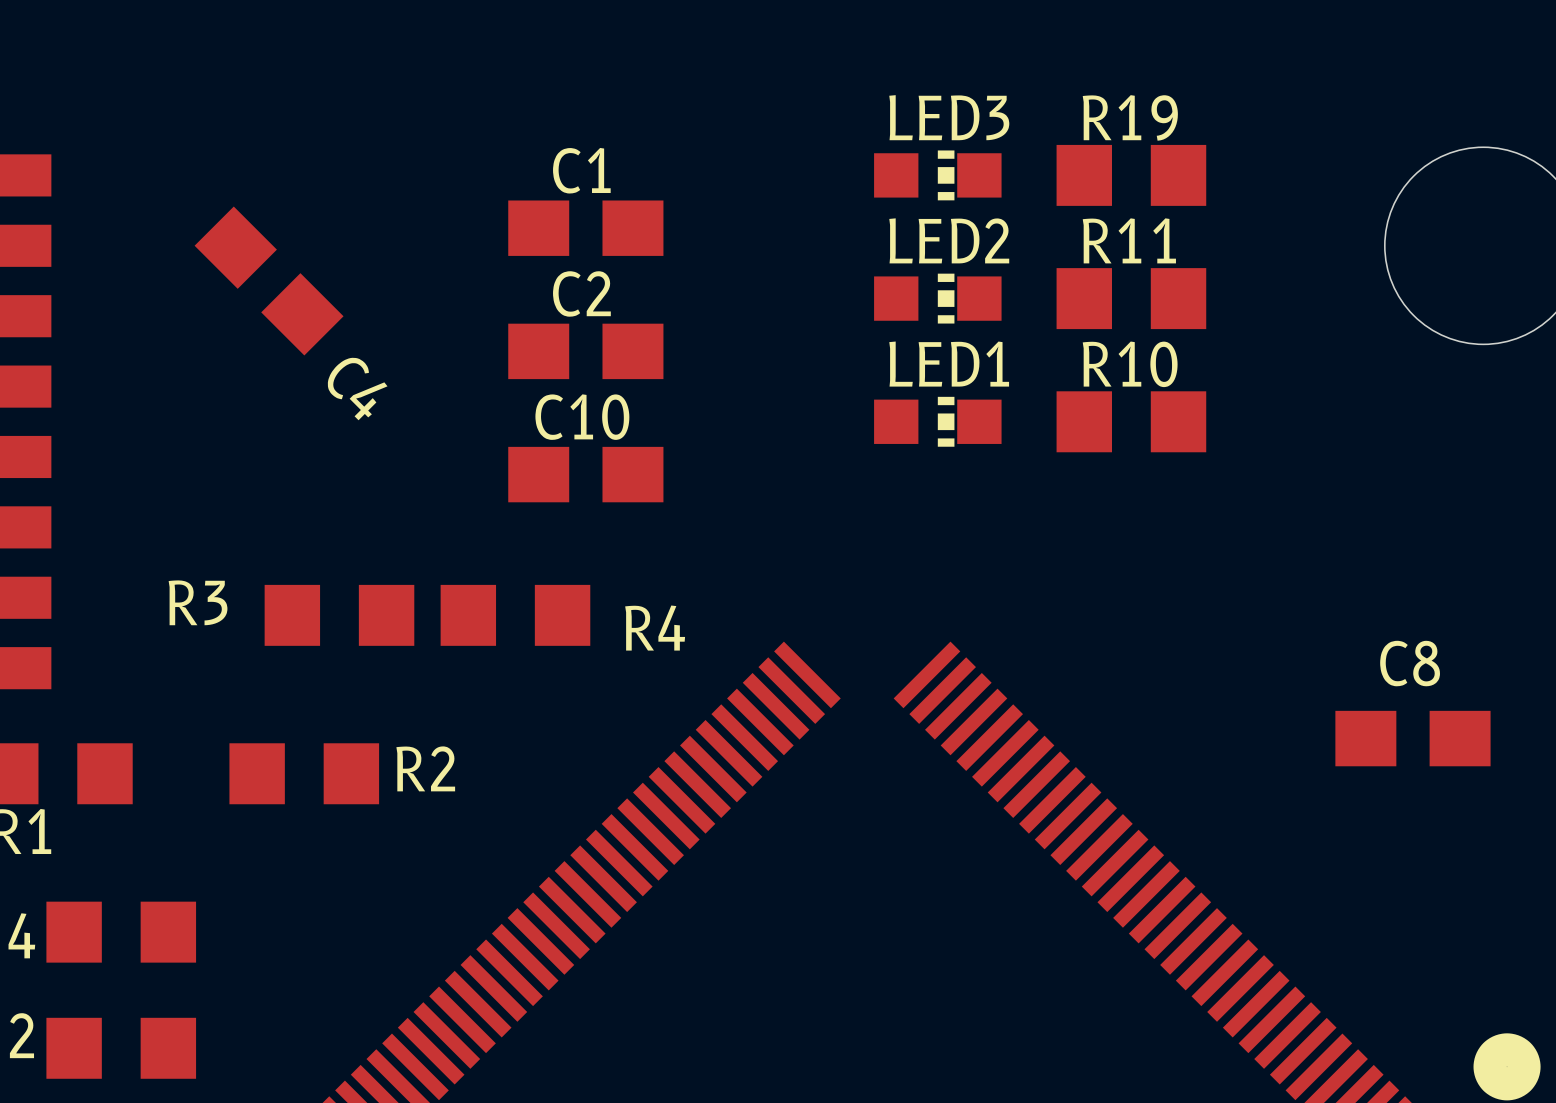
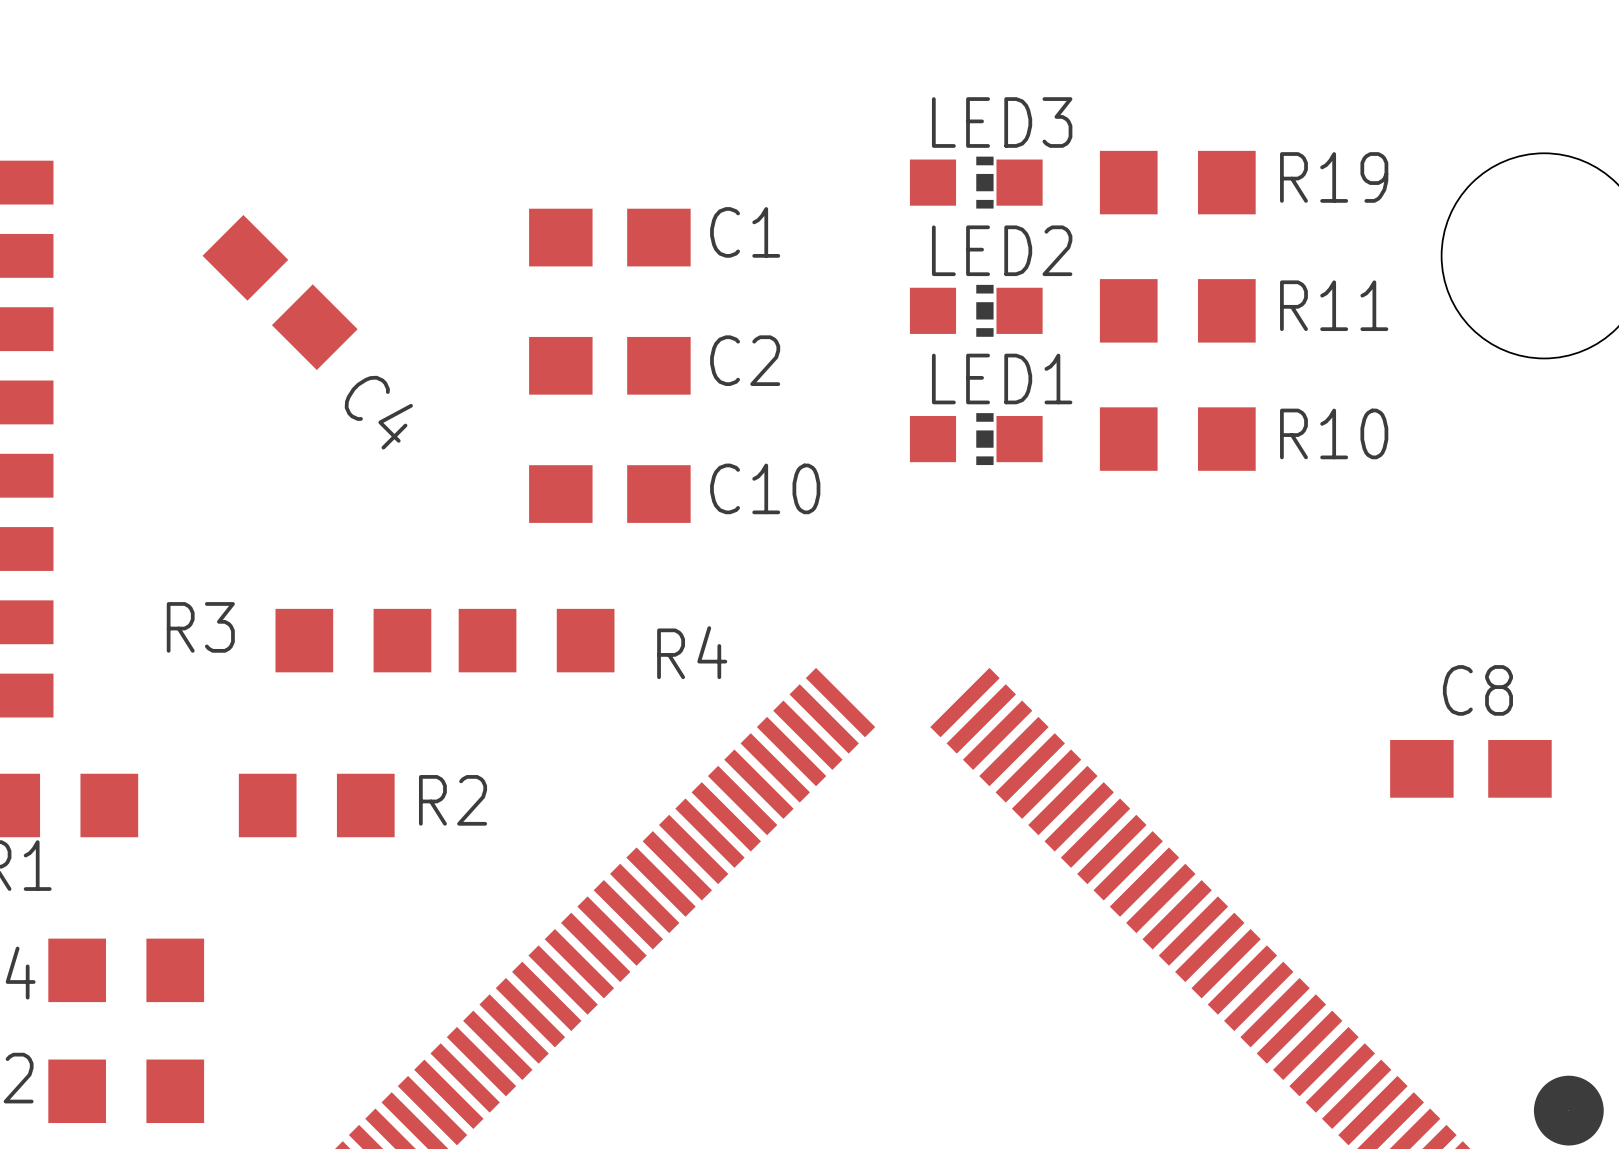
R19 name position: R19 (1130, 117) -> R19 (1334, 177)
C1 name position: C1 (581, 170) -> C1 (745, 232)
R11 name position: R11 (1129, 240) -> R11 (1334, 305)
C2 name position: C2 (581, 293) -> C2 (745, 360)
R10 name position: R10 (1130, 364) -> R10 (1334, 433)
C10 name position: C10 (582, 417) -> C10 (765, 488)

